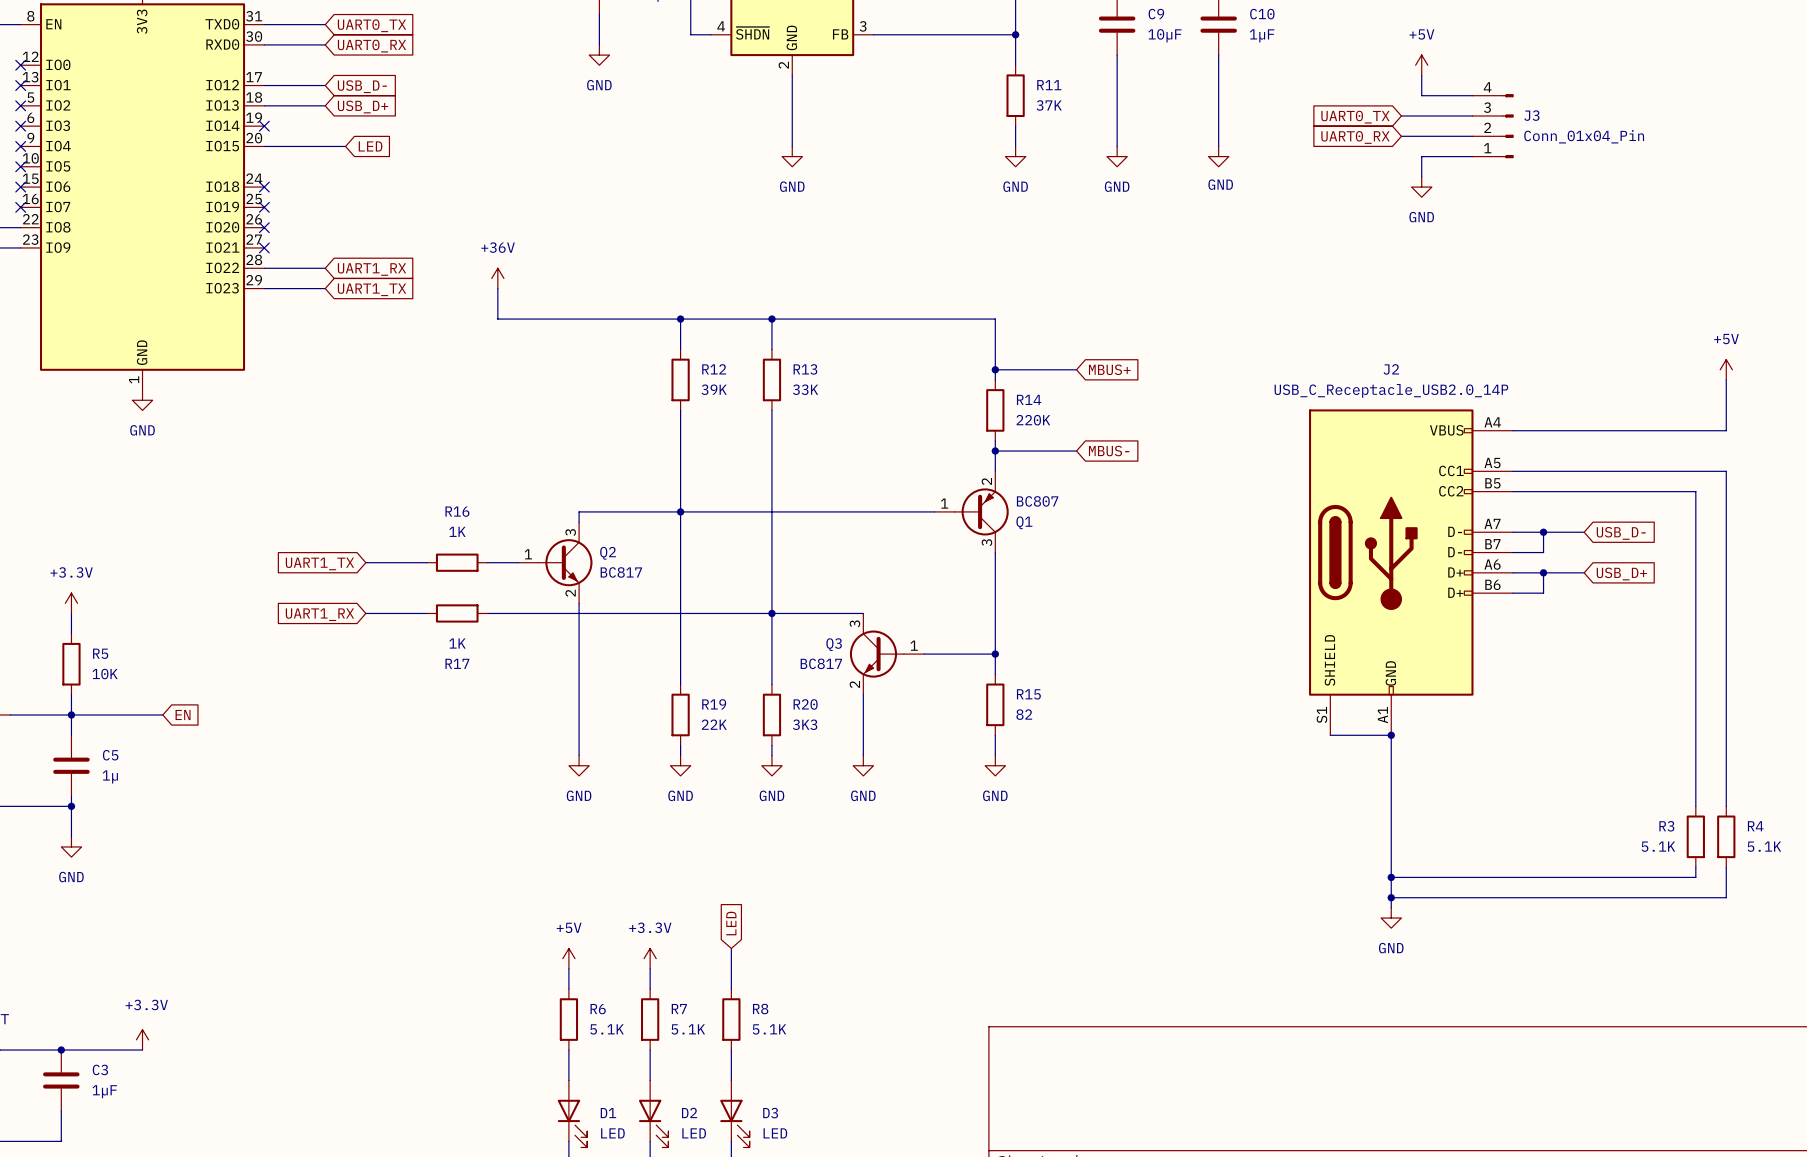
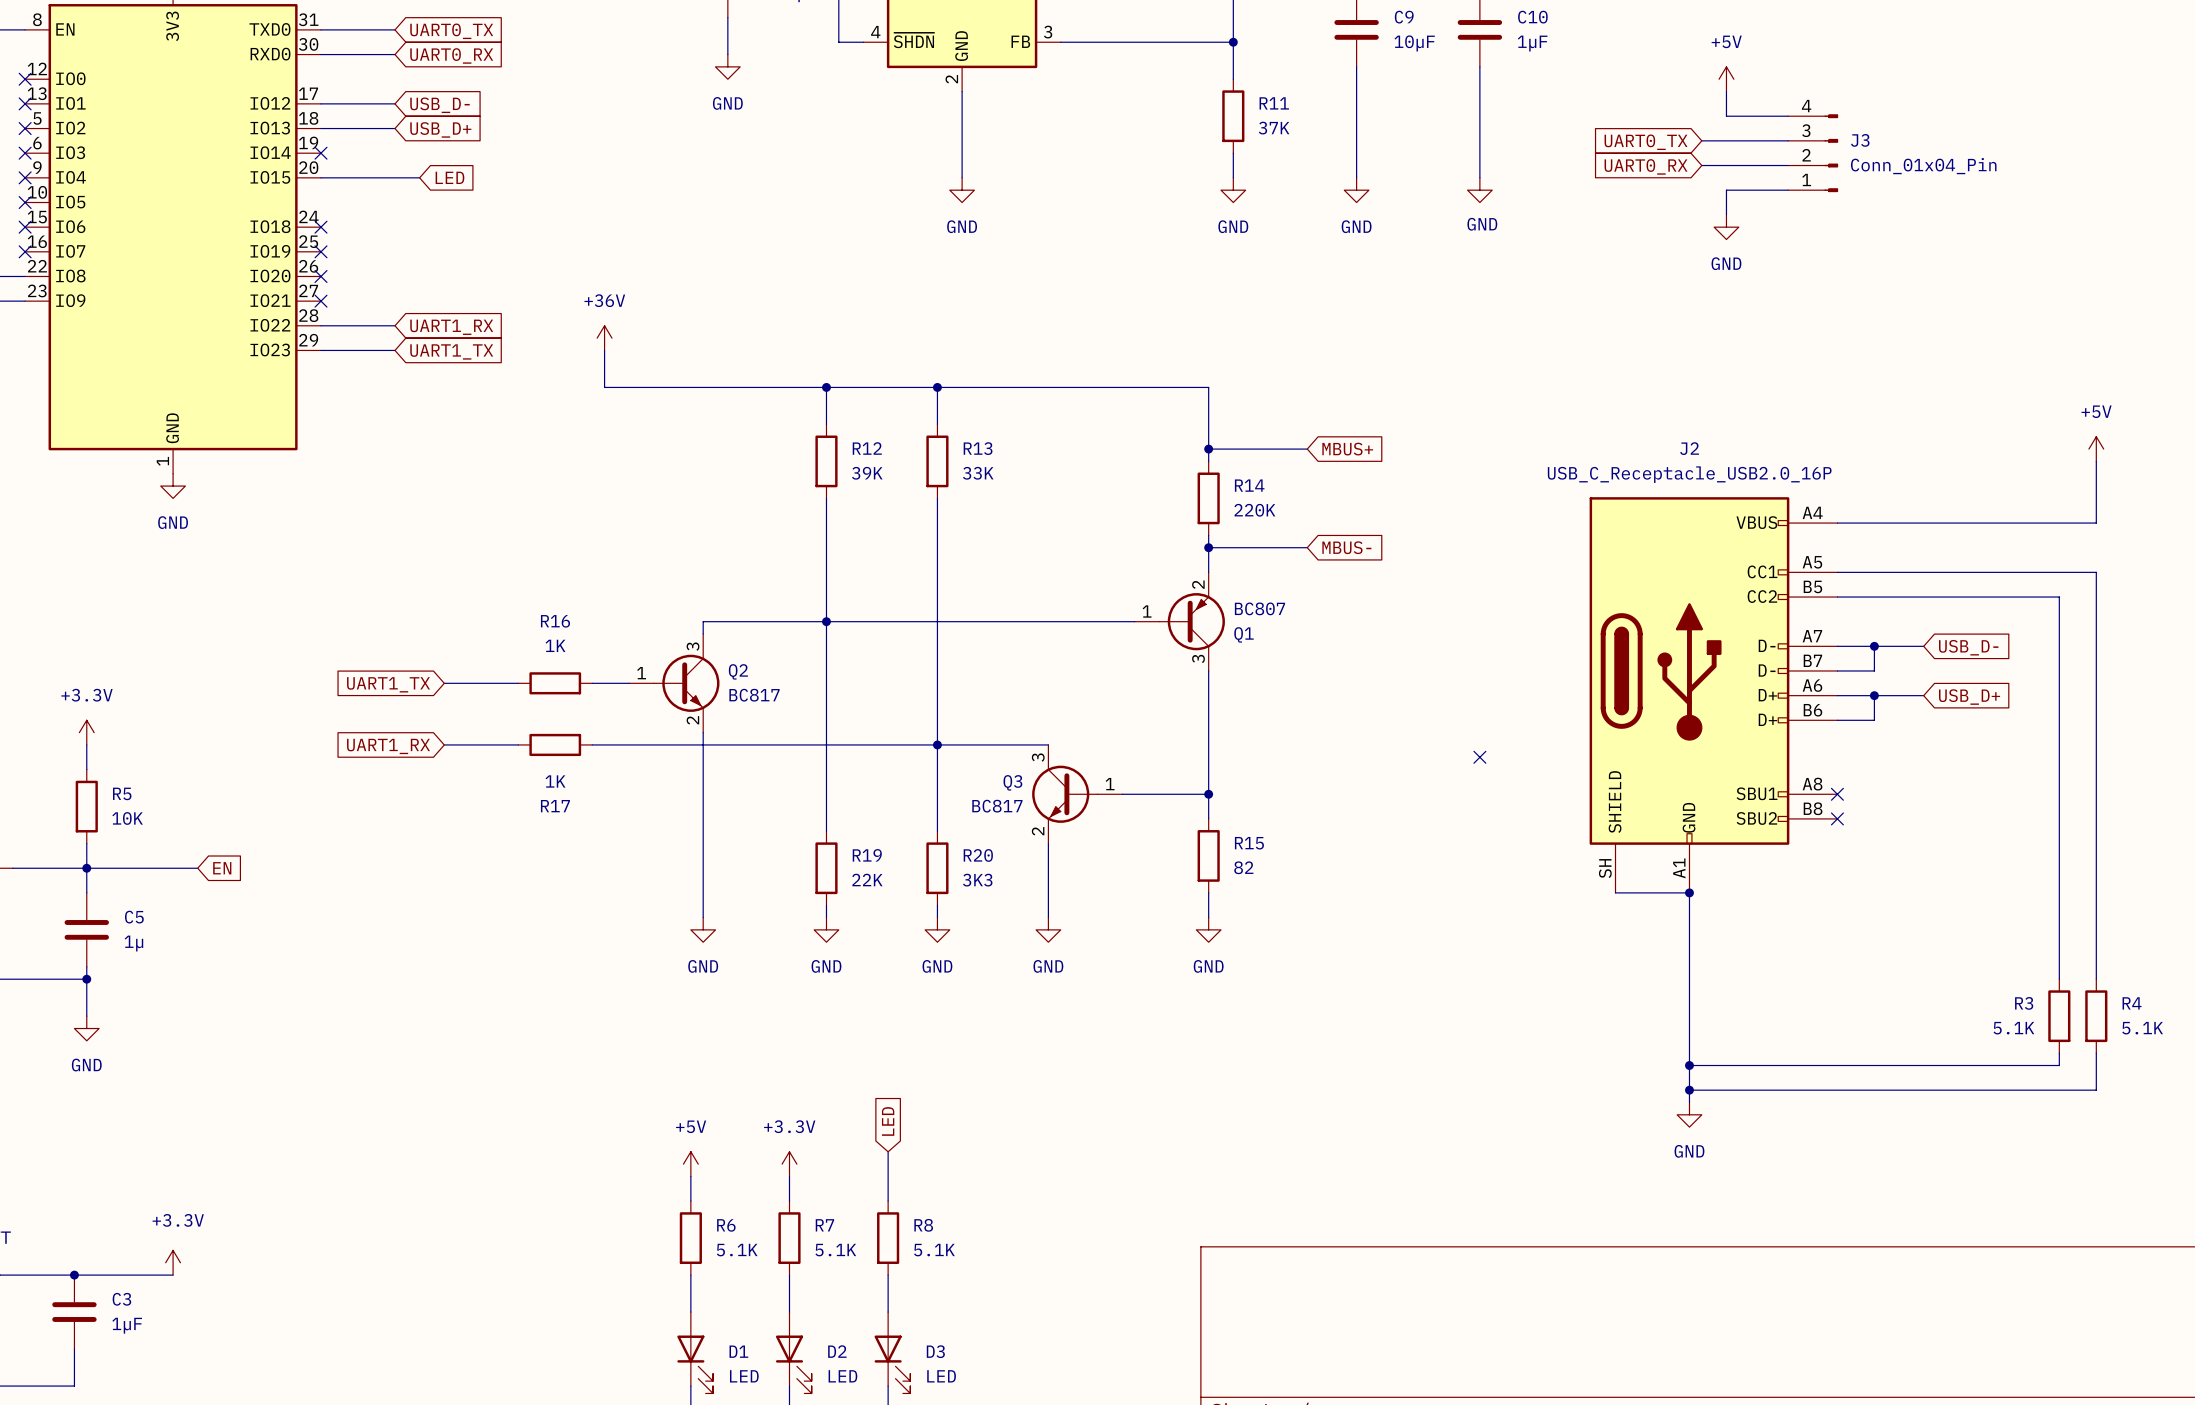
J2 value: USB_C_Receptacle_USB2.0_14P (1391, 390) -> USB_C_Receptacle_USB2.0_16P (1689, 474)
J2 symbol: [1309, 409, 1514, 736] -> [1589, 497, 1838, 893]
no-connect mark: none -> (1479, 757)
no-connect mark: none -> (1837, 794)
no-connect mark: none -> (1837, 818)

